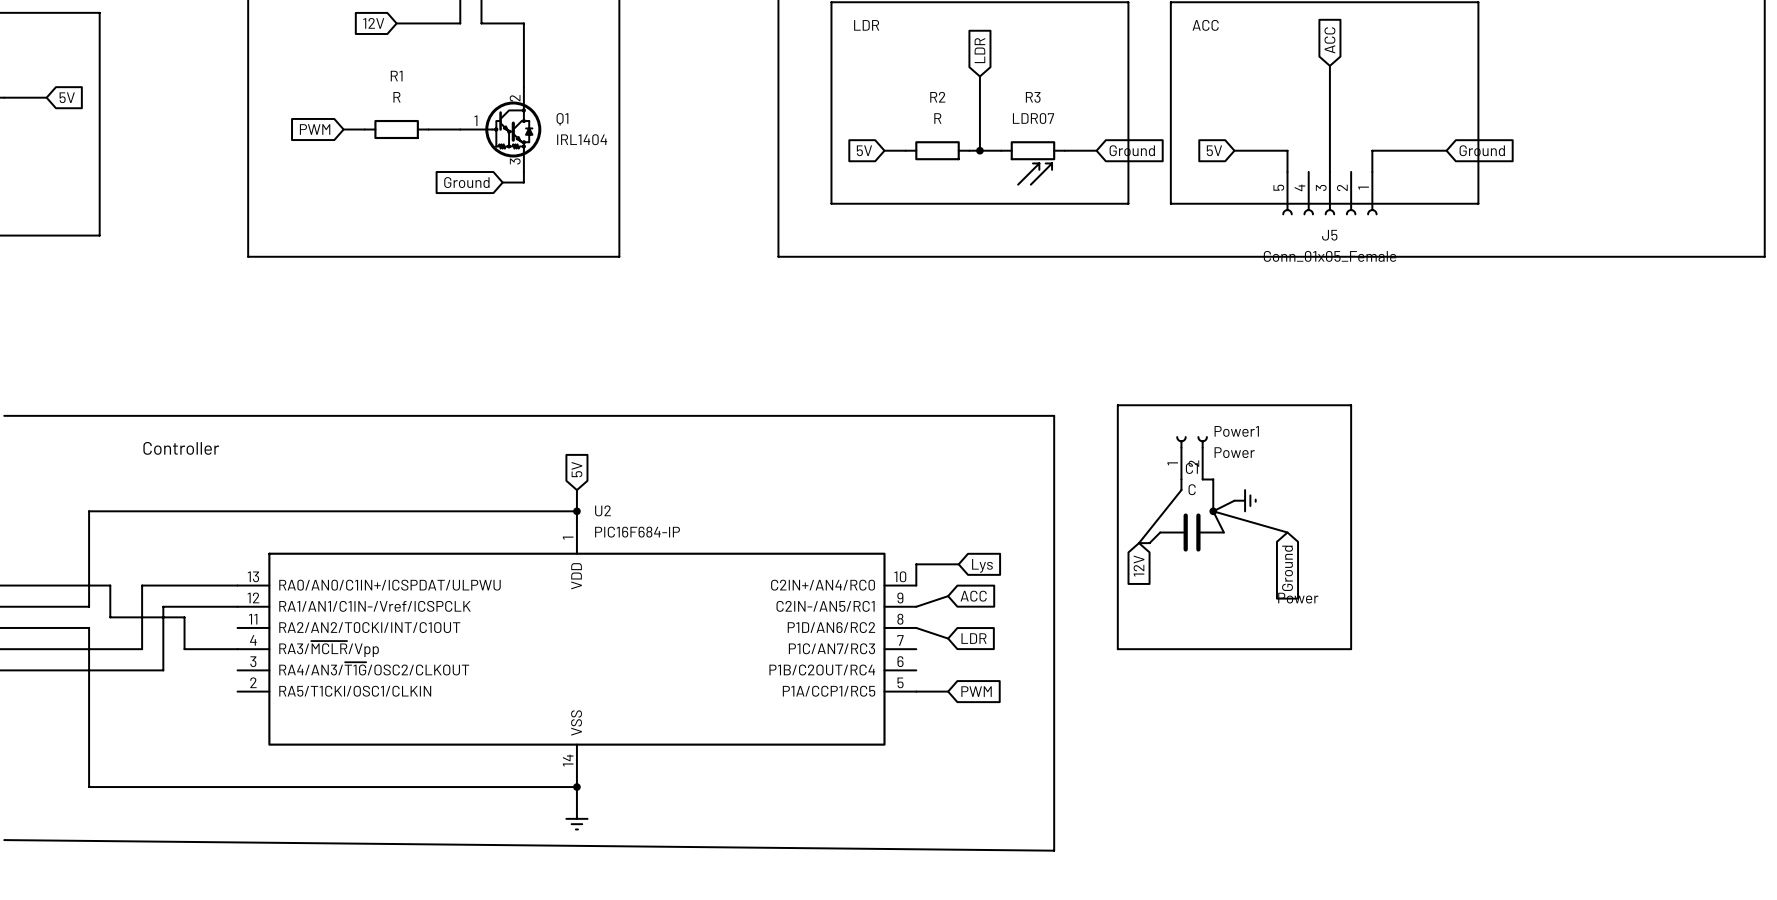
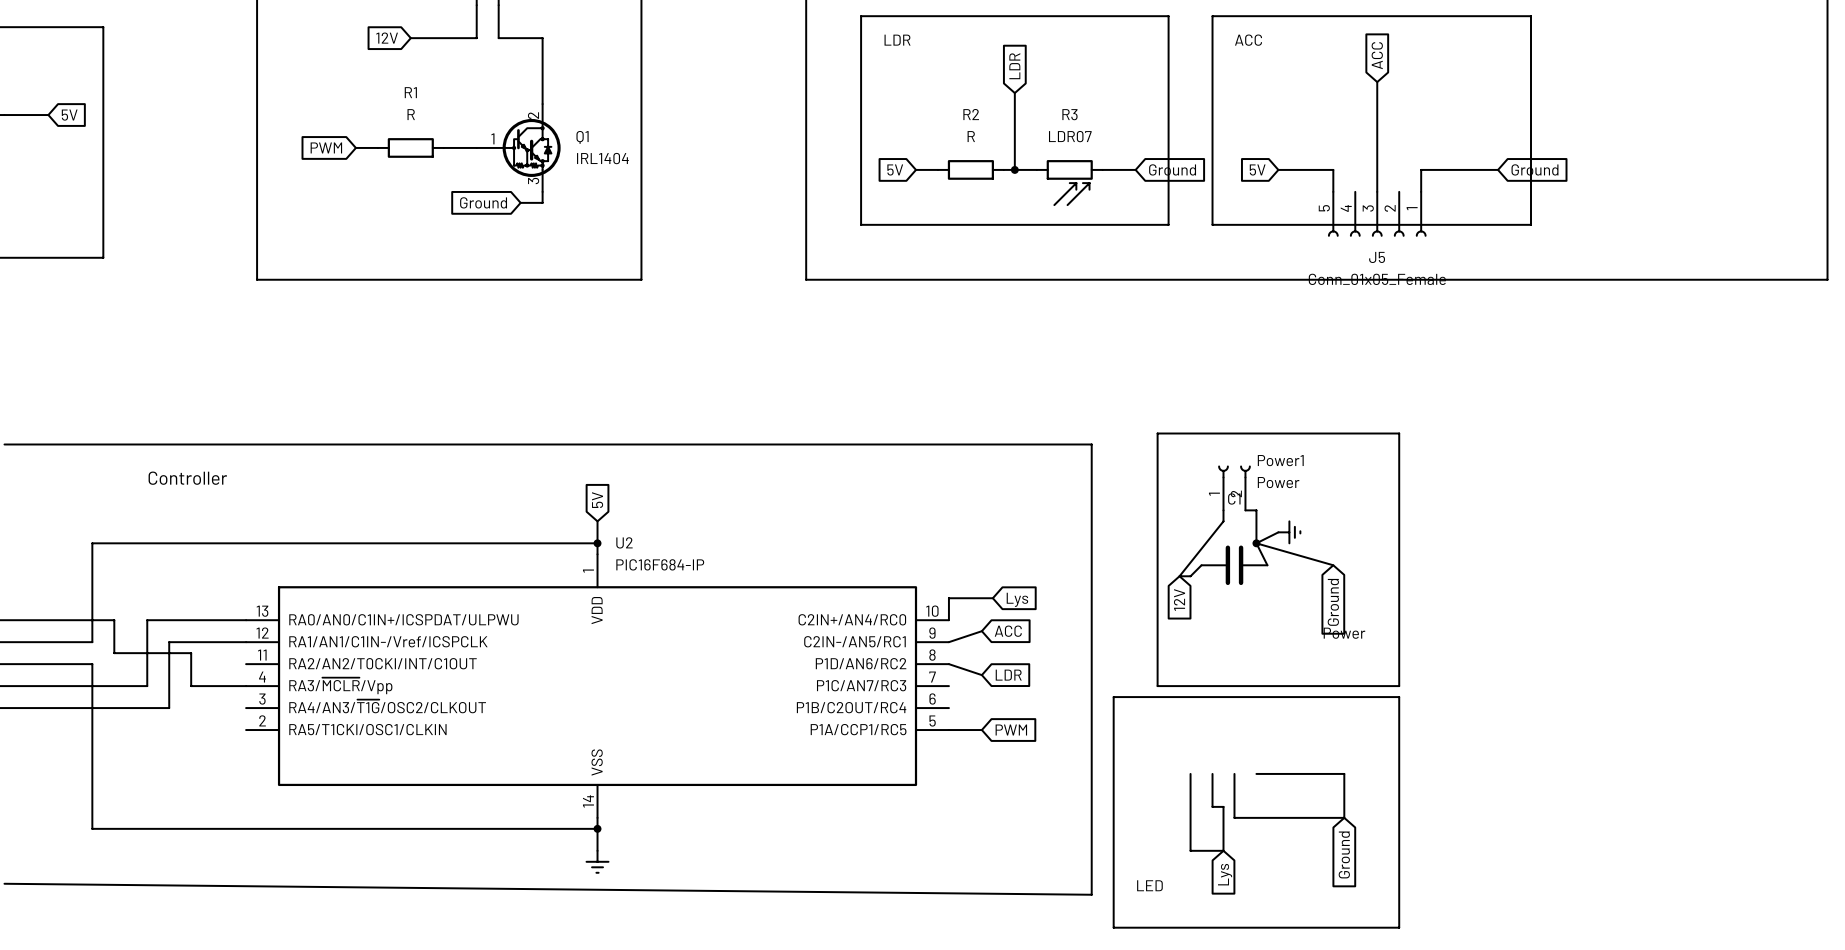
C1 value: C (1192, 489) -> none
line: none -> (1113, 697) (1113, 927) (1399, 927) (1399, 697) (1113, 697)
wire: none -> (1190, 773) (1190, 850) (1223, 850) (1223, 806) (1212, 806) (1212, 773)
wire: none -> (1234, 773) (1234, 817) (1344, 817) (1344, 773) (1256, 773)
global label: none -> Ground (1344, 854)
global label: none -> Lys (1225, 874)
text: none -> LED (1149, 885)

